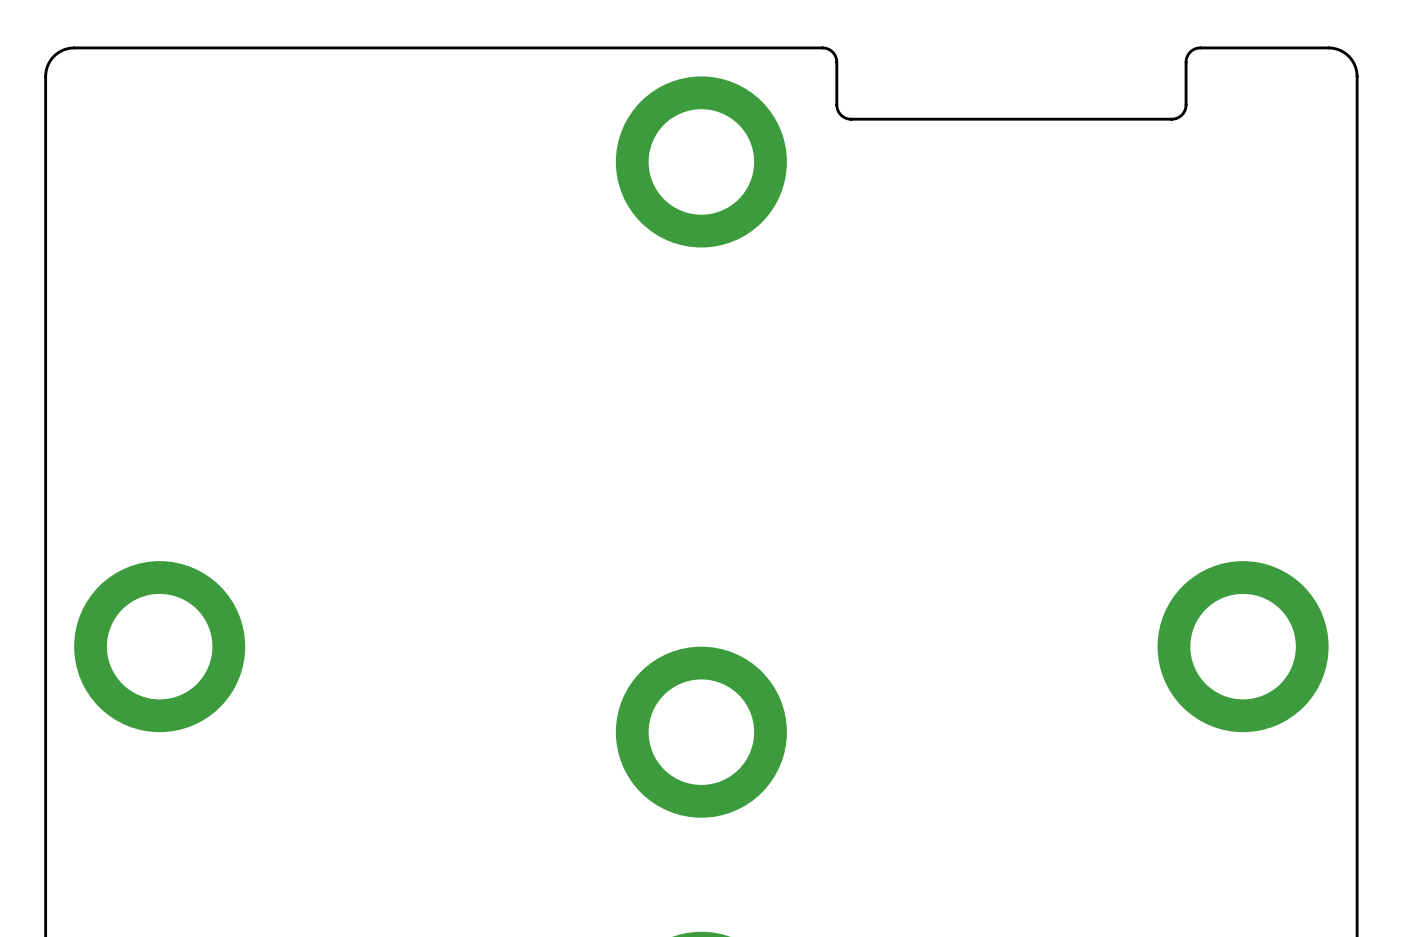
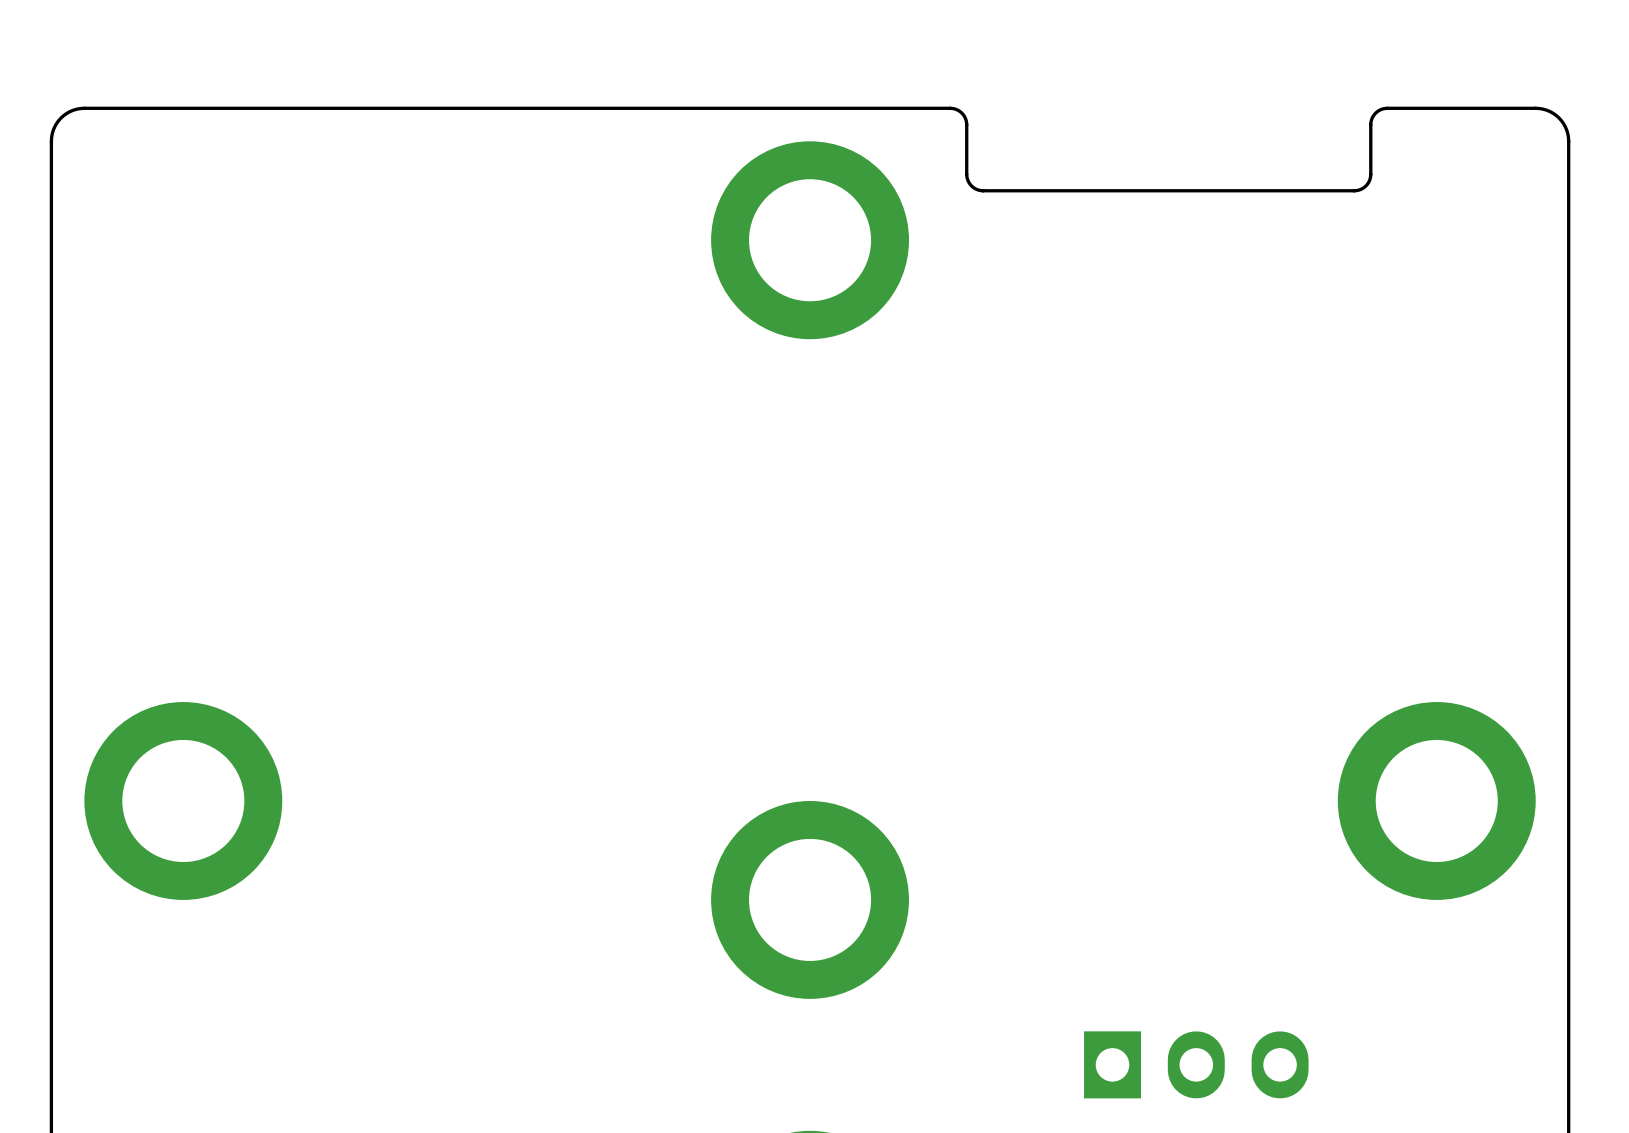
part: none -> (1196, 1064)

